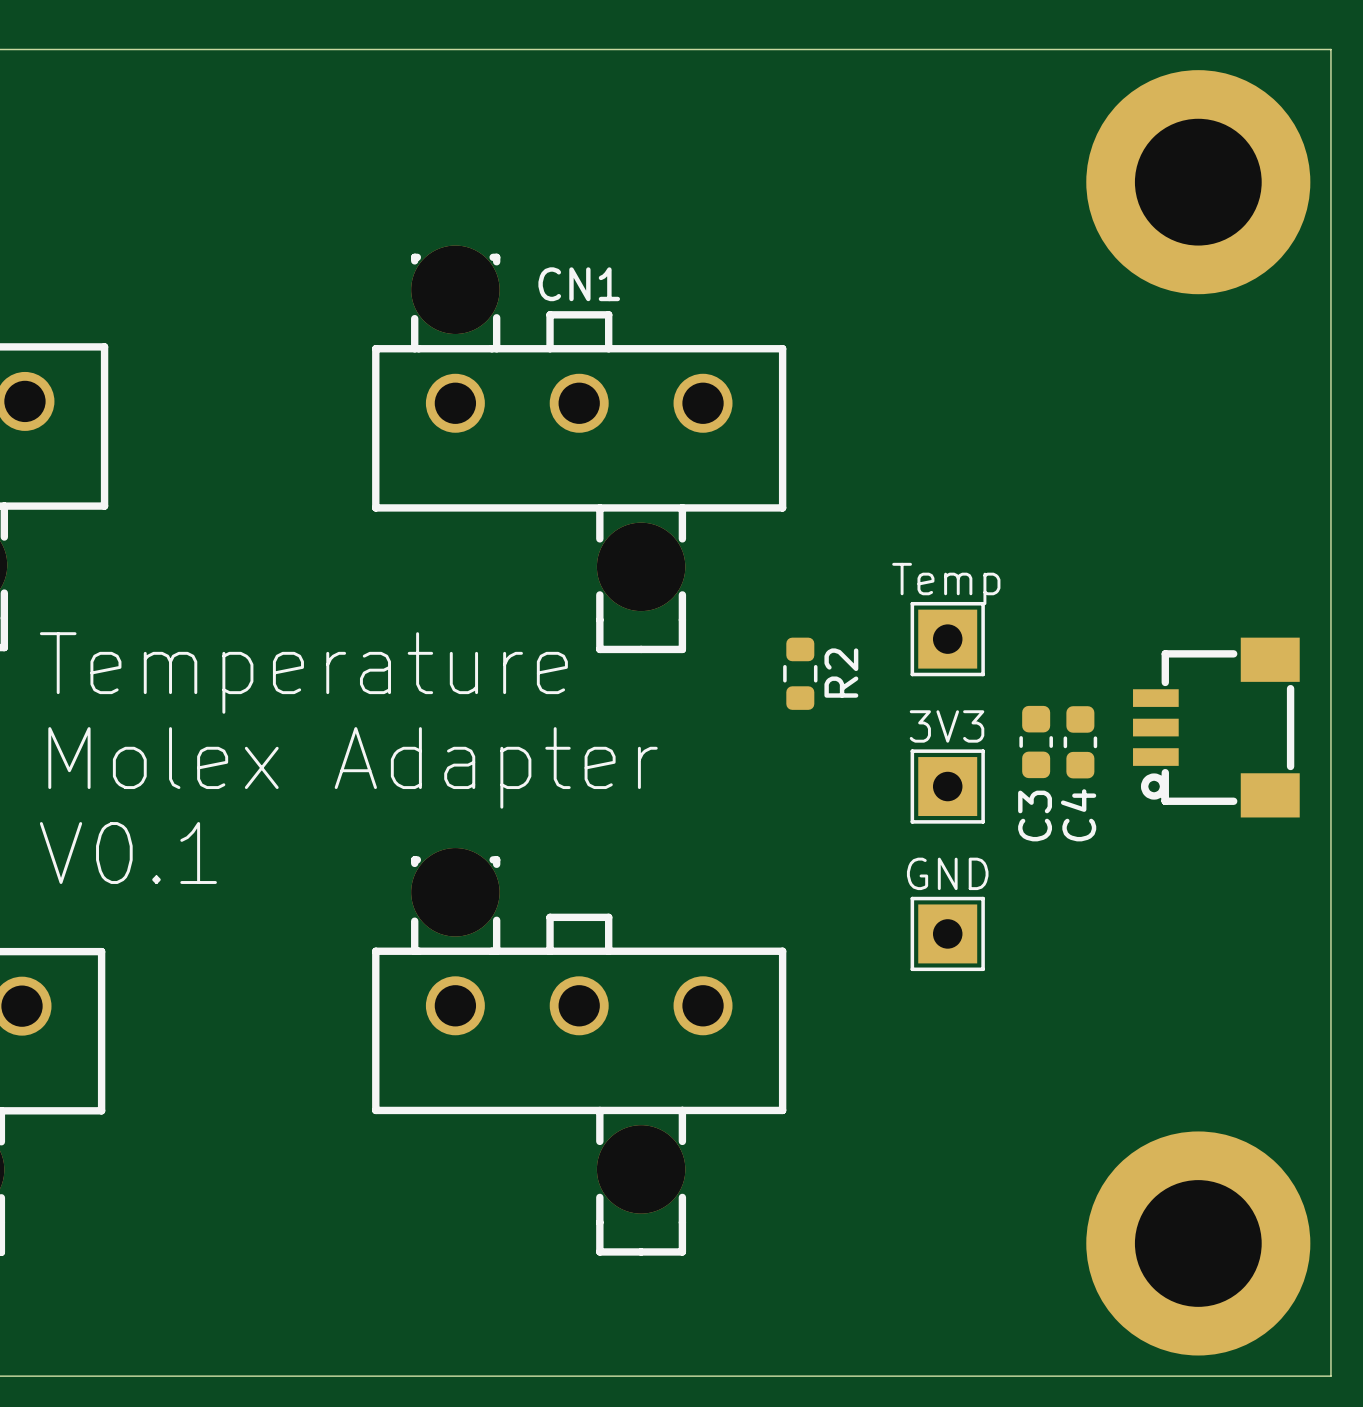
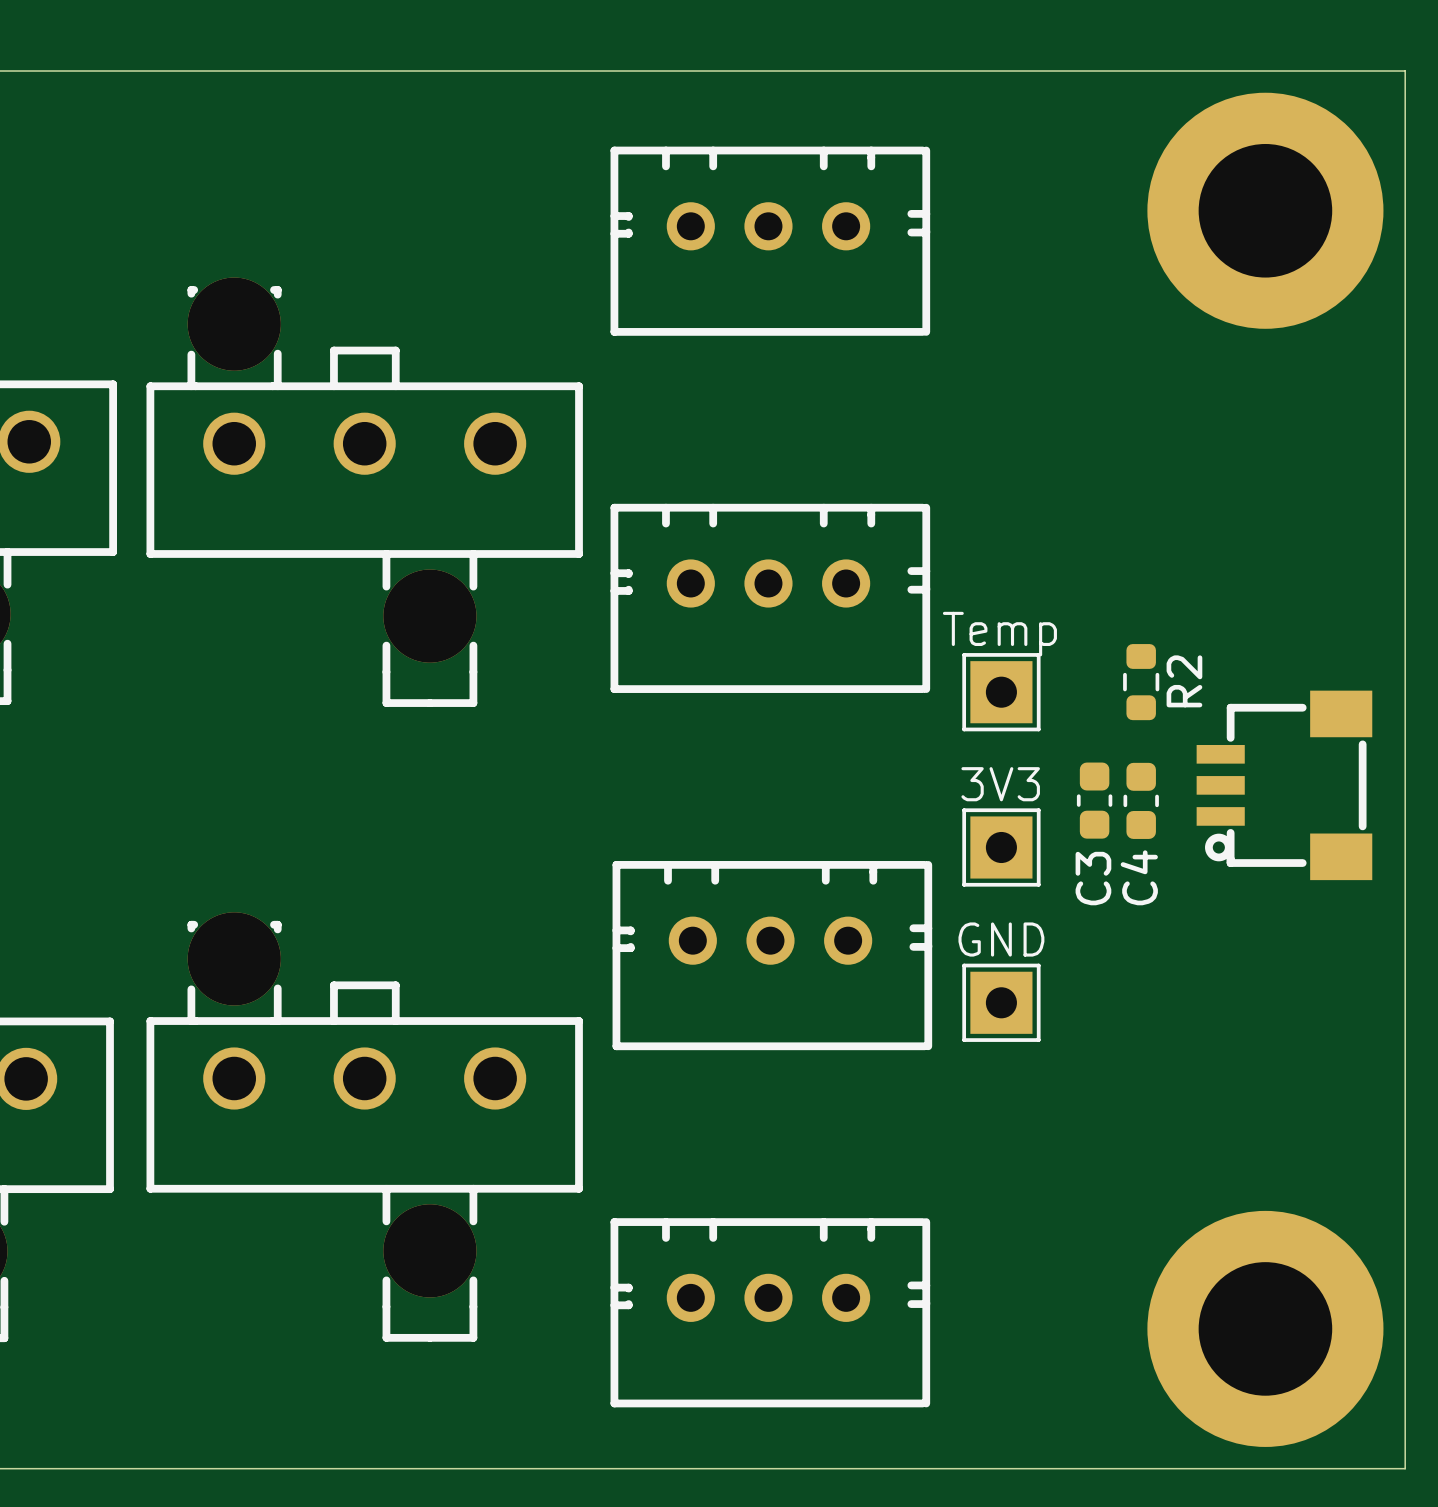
part: none -> (770, 241)
part: none -> (364, 492)
CN1: (579, 449) -> none
part: none -> (770, 598)
text: Temperature (303, 672) -> none
R2 position: (800, 673) -> (1141, 682)
text: Molex Adapter (353, 767) -> none
text: V0.1 (128, 853) -> none
part: none -> (772, 955)
part position: (579, 1051) -> (364, 1127)
part: none -> (770, 1312)

